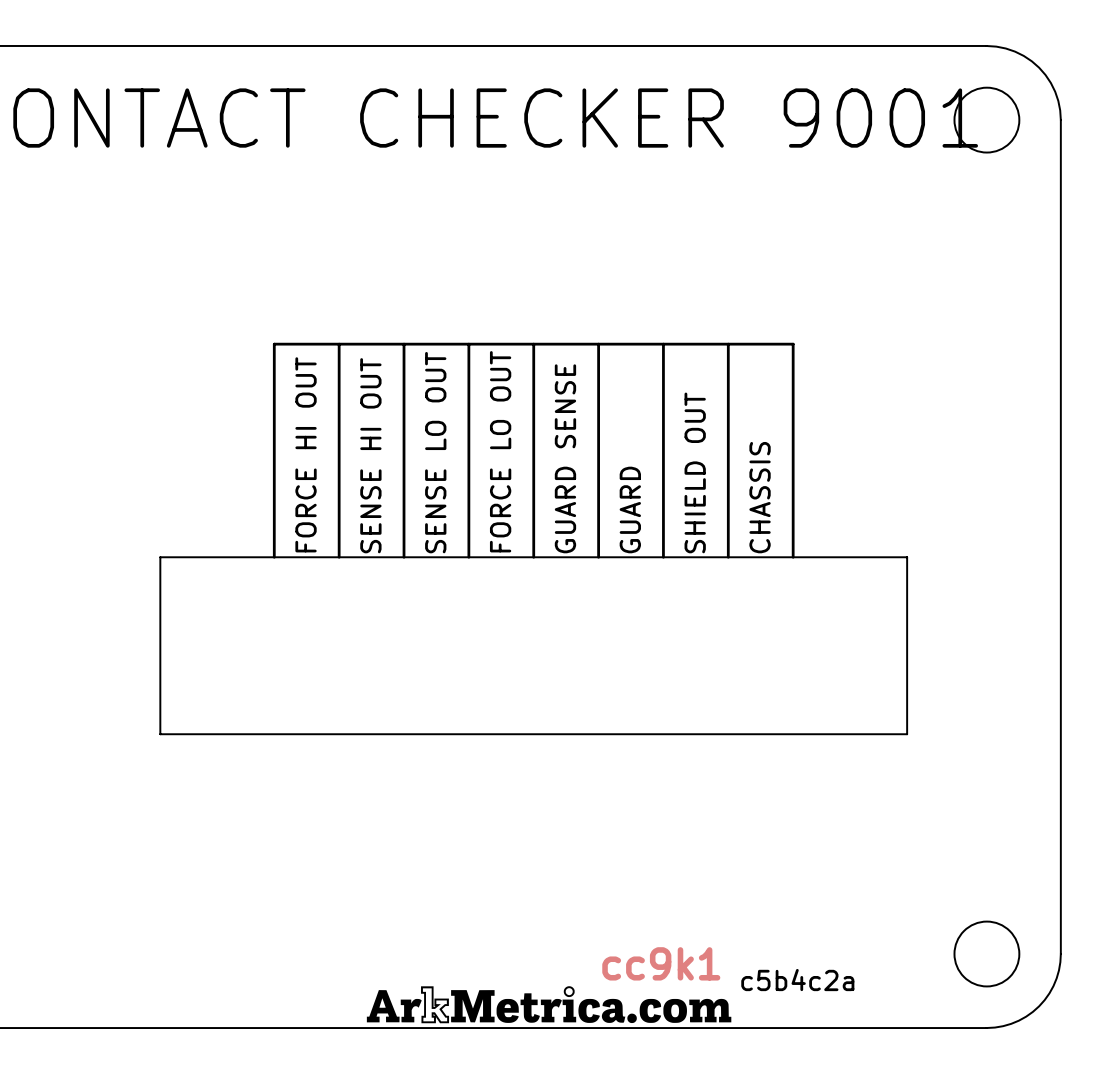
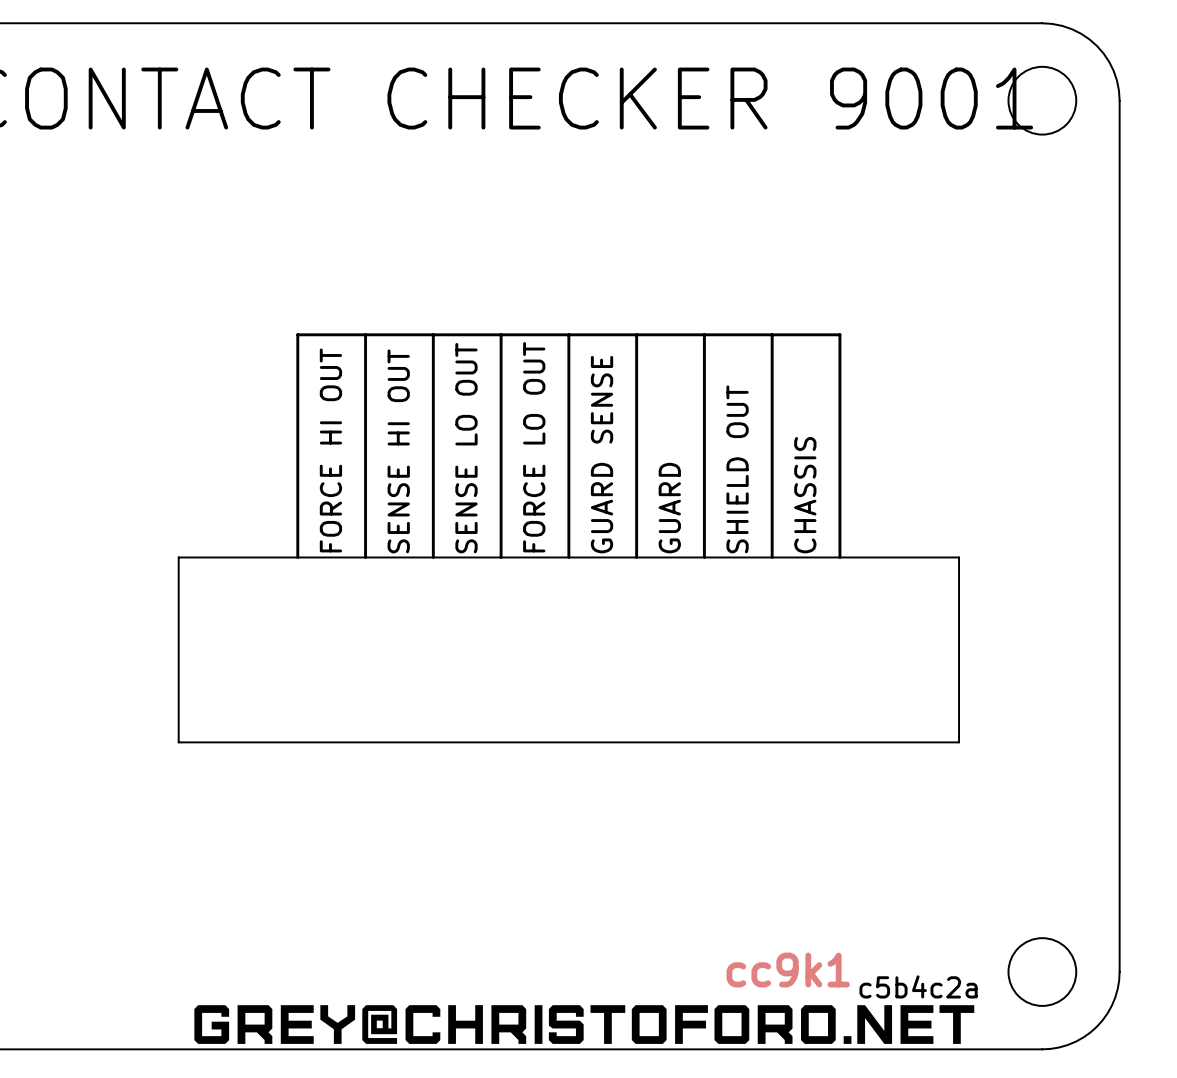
text position: cc9k1 (661, 963) -> cc9k1 (788, 970)
text position: c5b4c2a (797, 980) -> c5b4c2a (918, 986)
drawing shape: [366, 986, 732, 1024] -> [194, 1005, 975, 1044]

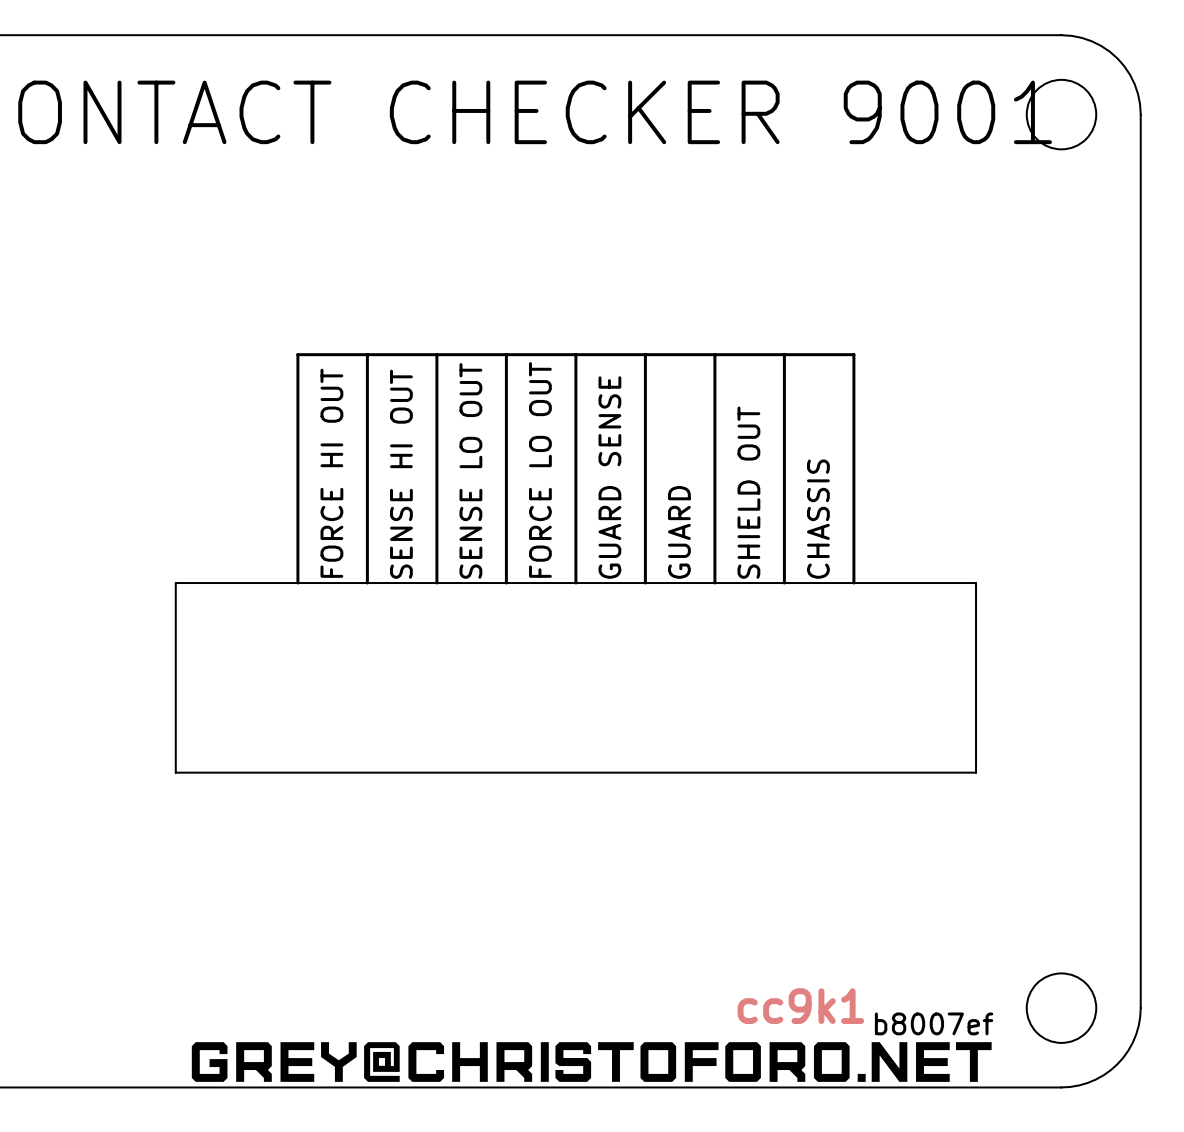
text: c5b4c2a (918, 986) -> b8007ef (934, 1023)

